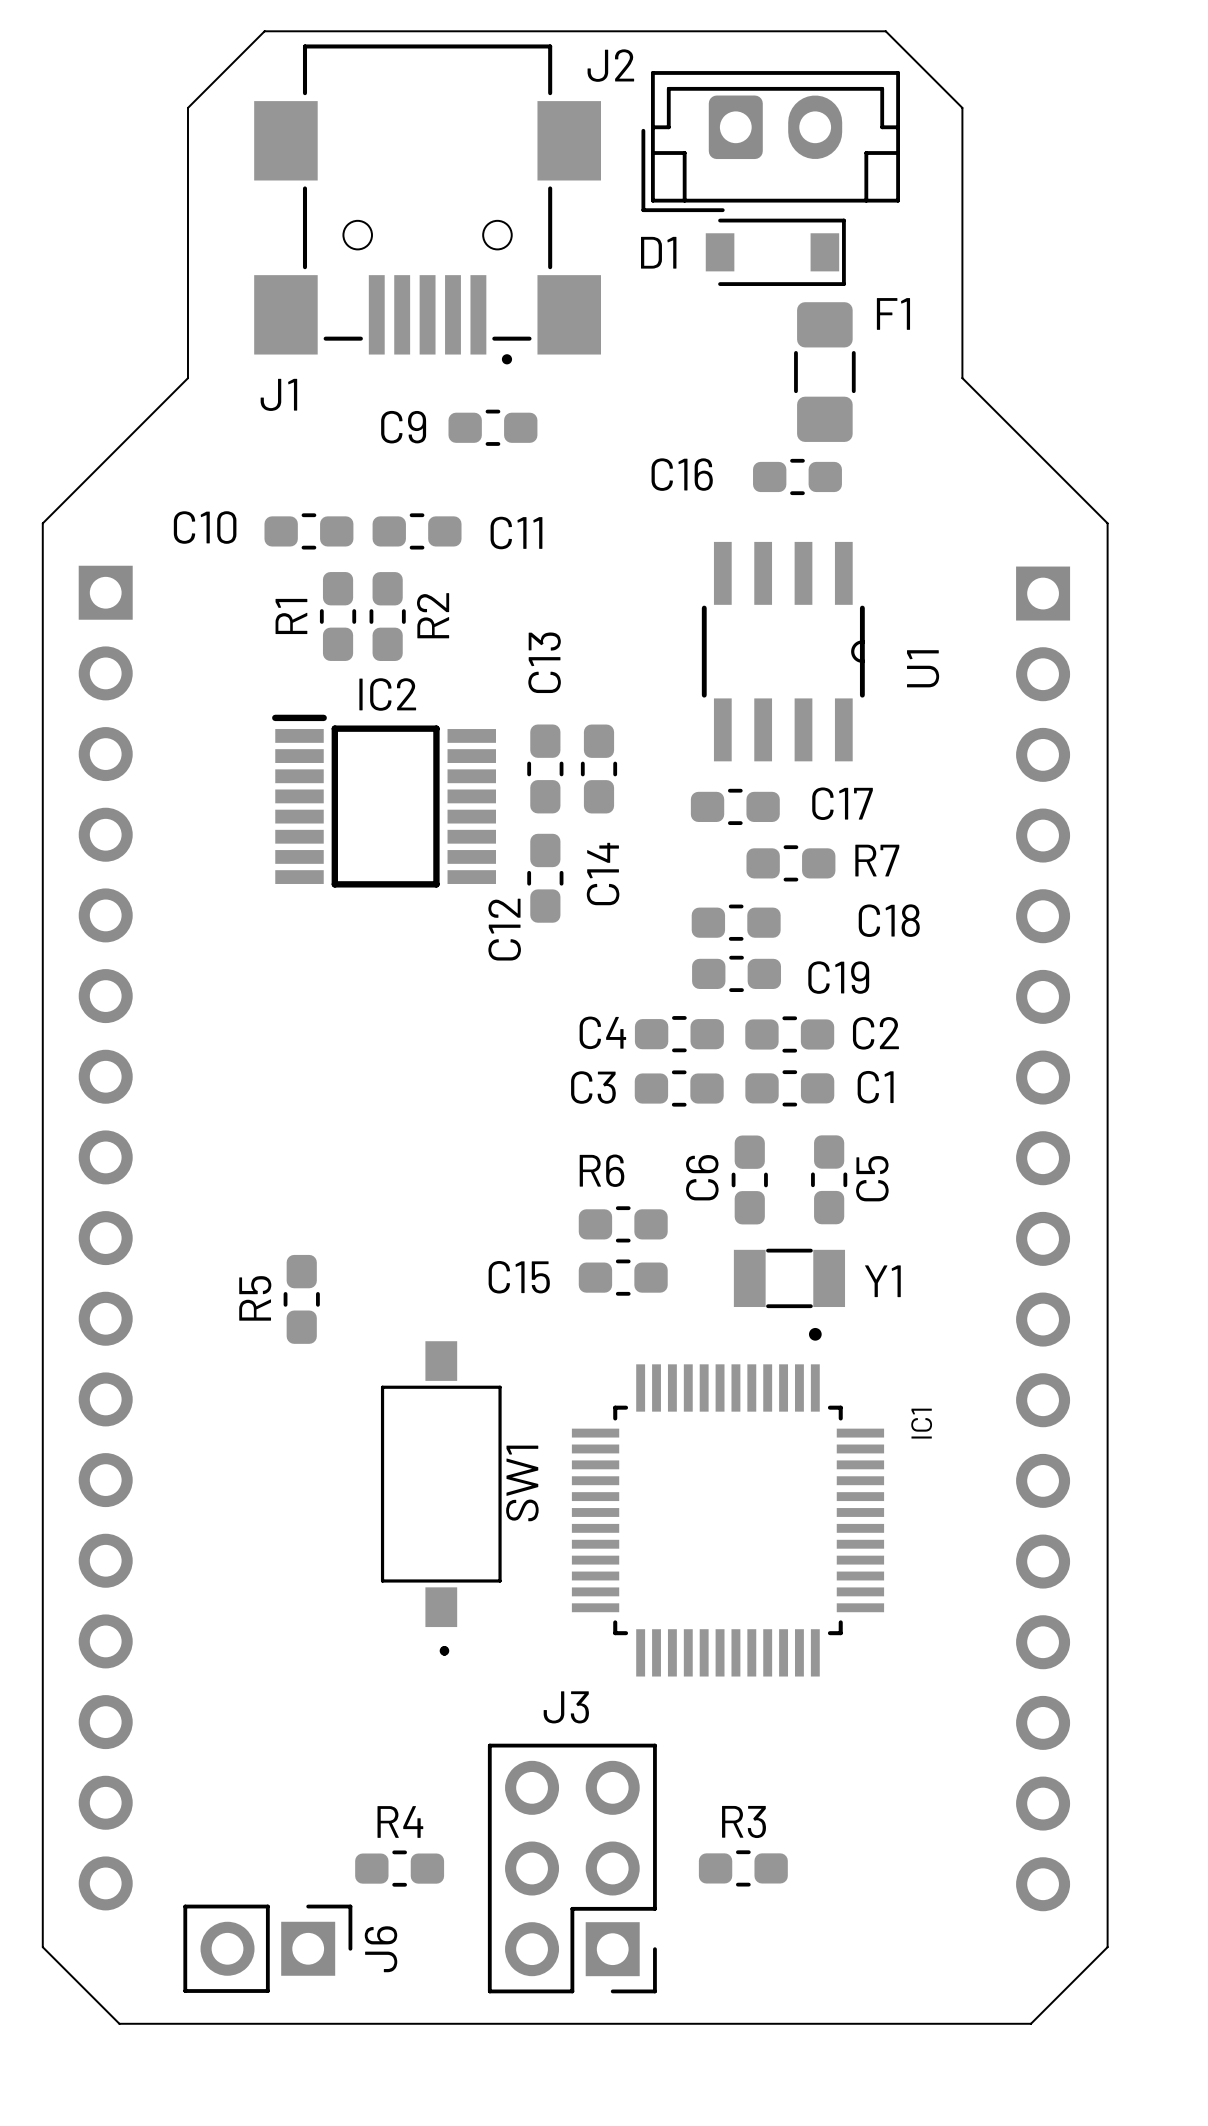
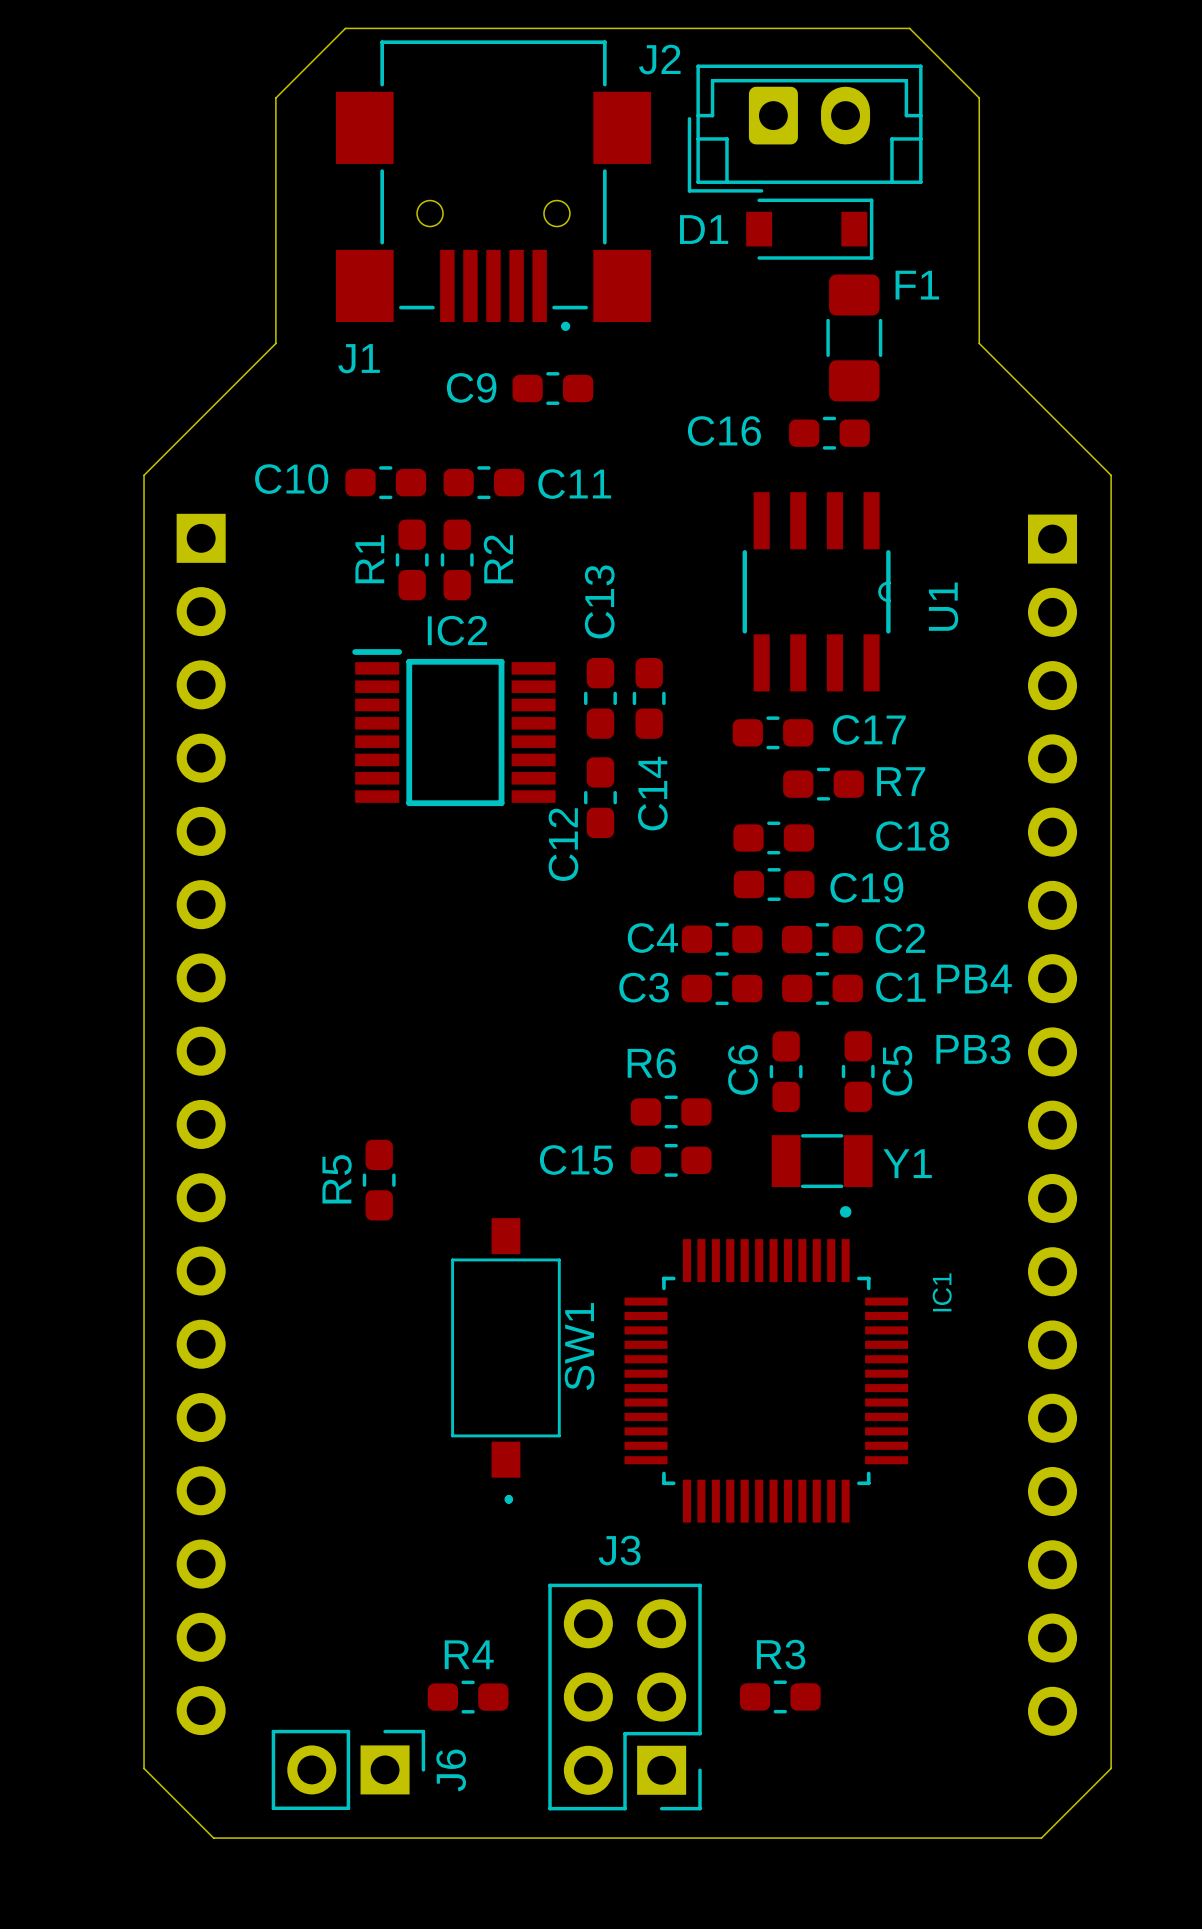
text: none -> PB4 (974, 979)
text: none -> PB3 (973, 1049)

